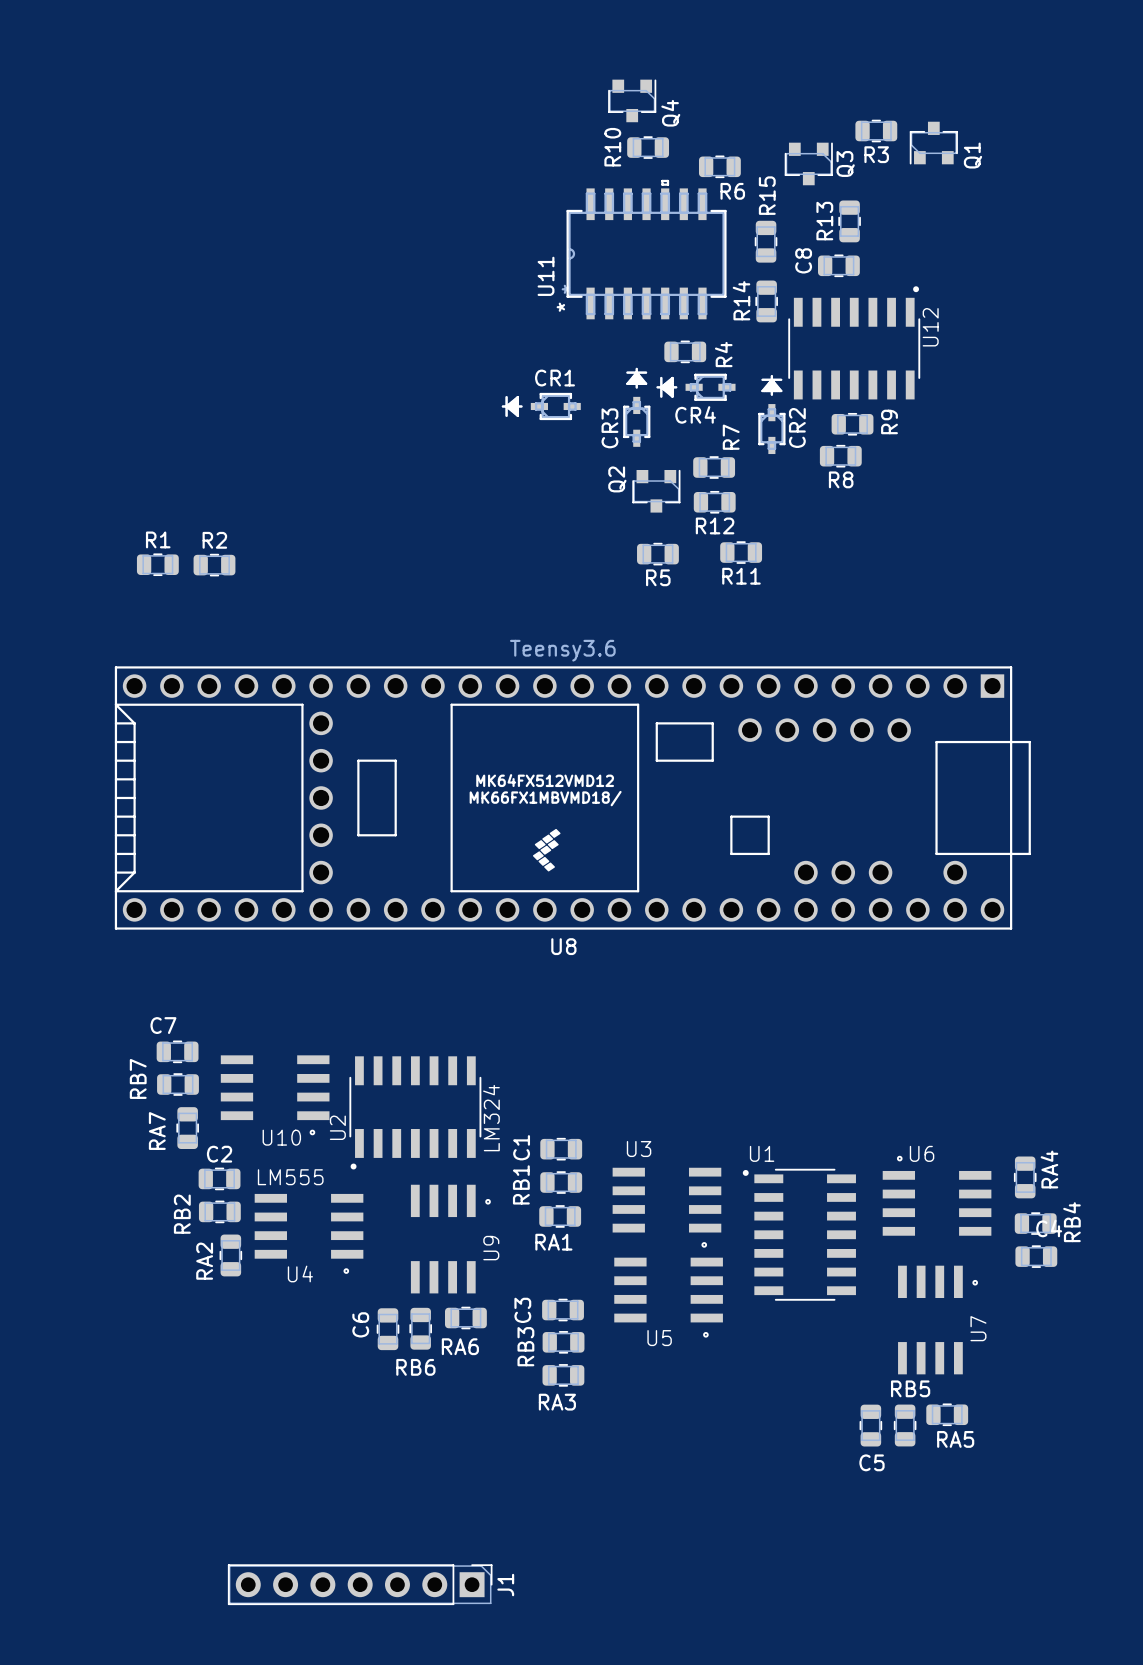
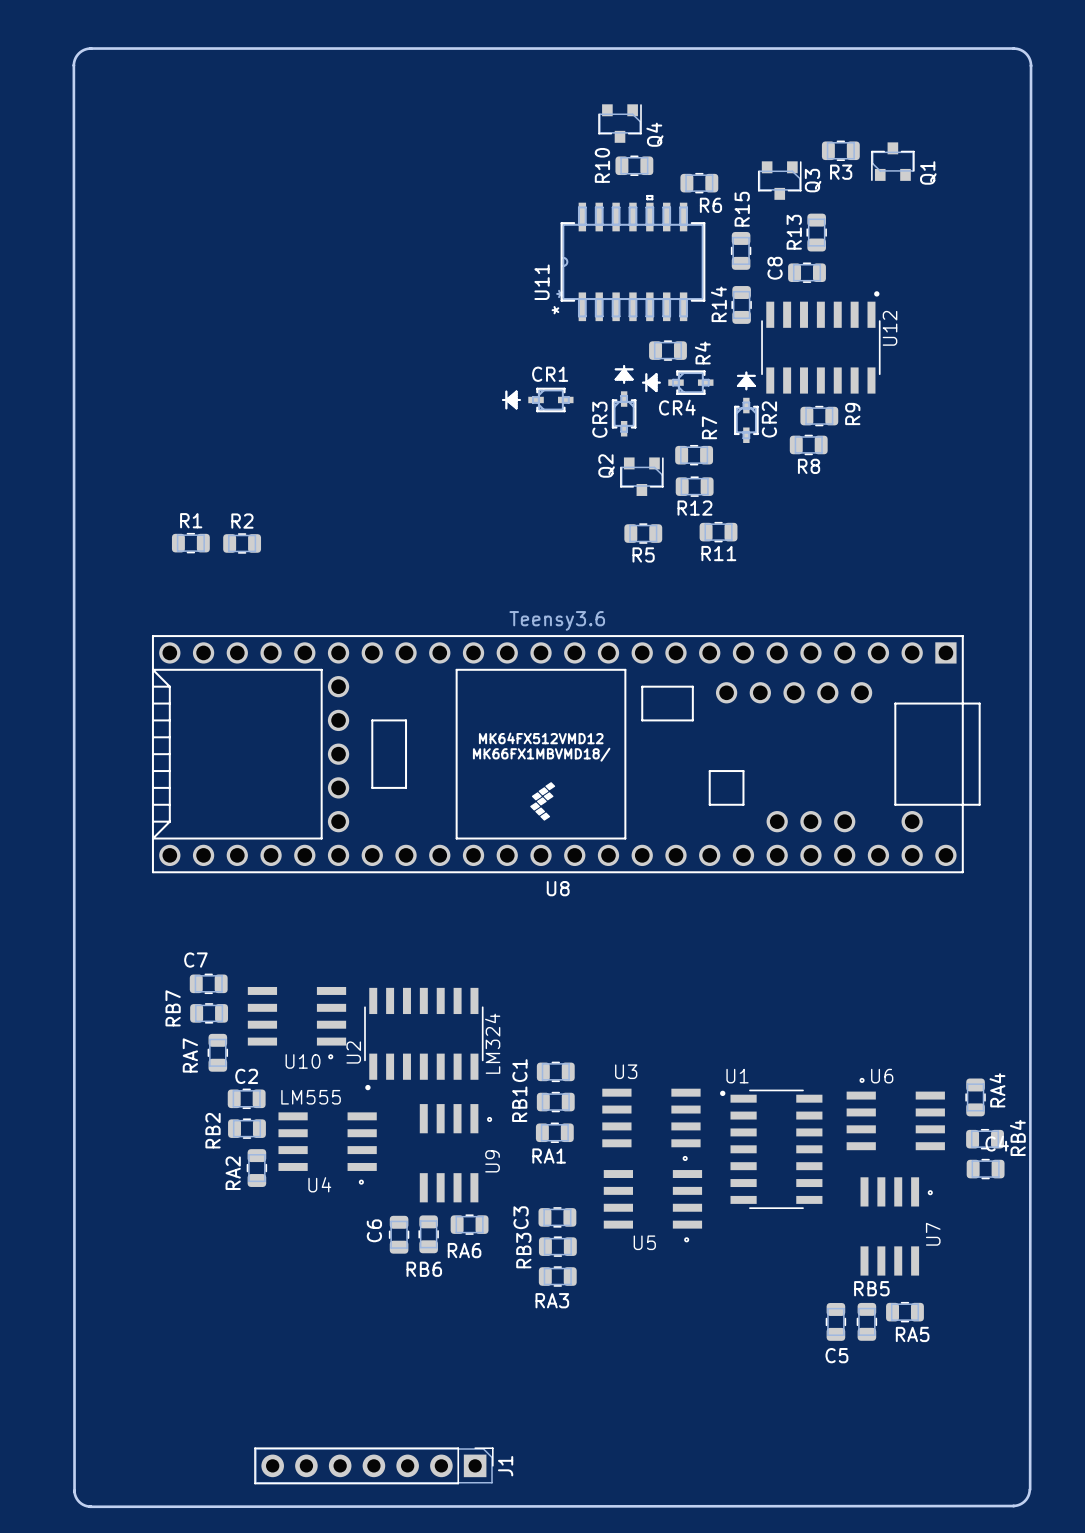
board edge: none -> (90, 48) (1013, 48)
board edge: none -> (91, 48) (78, 53) (73, 65)
board edge: none -> (1013, 48) (1026, 53) (1031, 66)
board edge: none -> (73, 65) (74, 1492)
board edge: none -> (1031, 65) (1030, 1489)
board edge: none -> (1029, 1489) (1024, 1501) (1013, 1505)
board edge: none -> (74, 1490) (79, 1502) (91, 1506)
board edge: none -> (1014, 1506) (89, 1506)

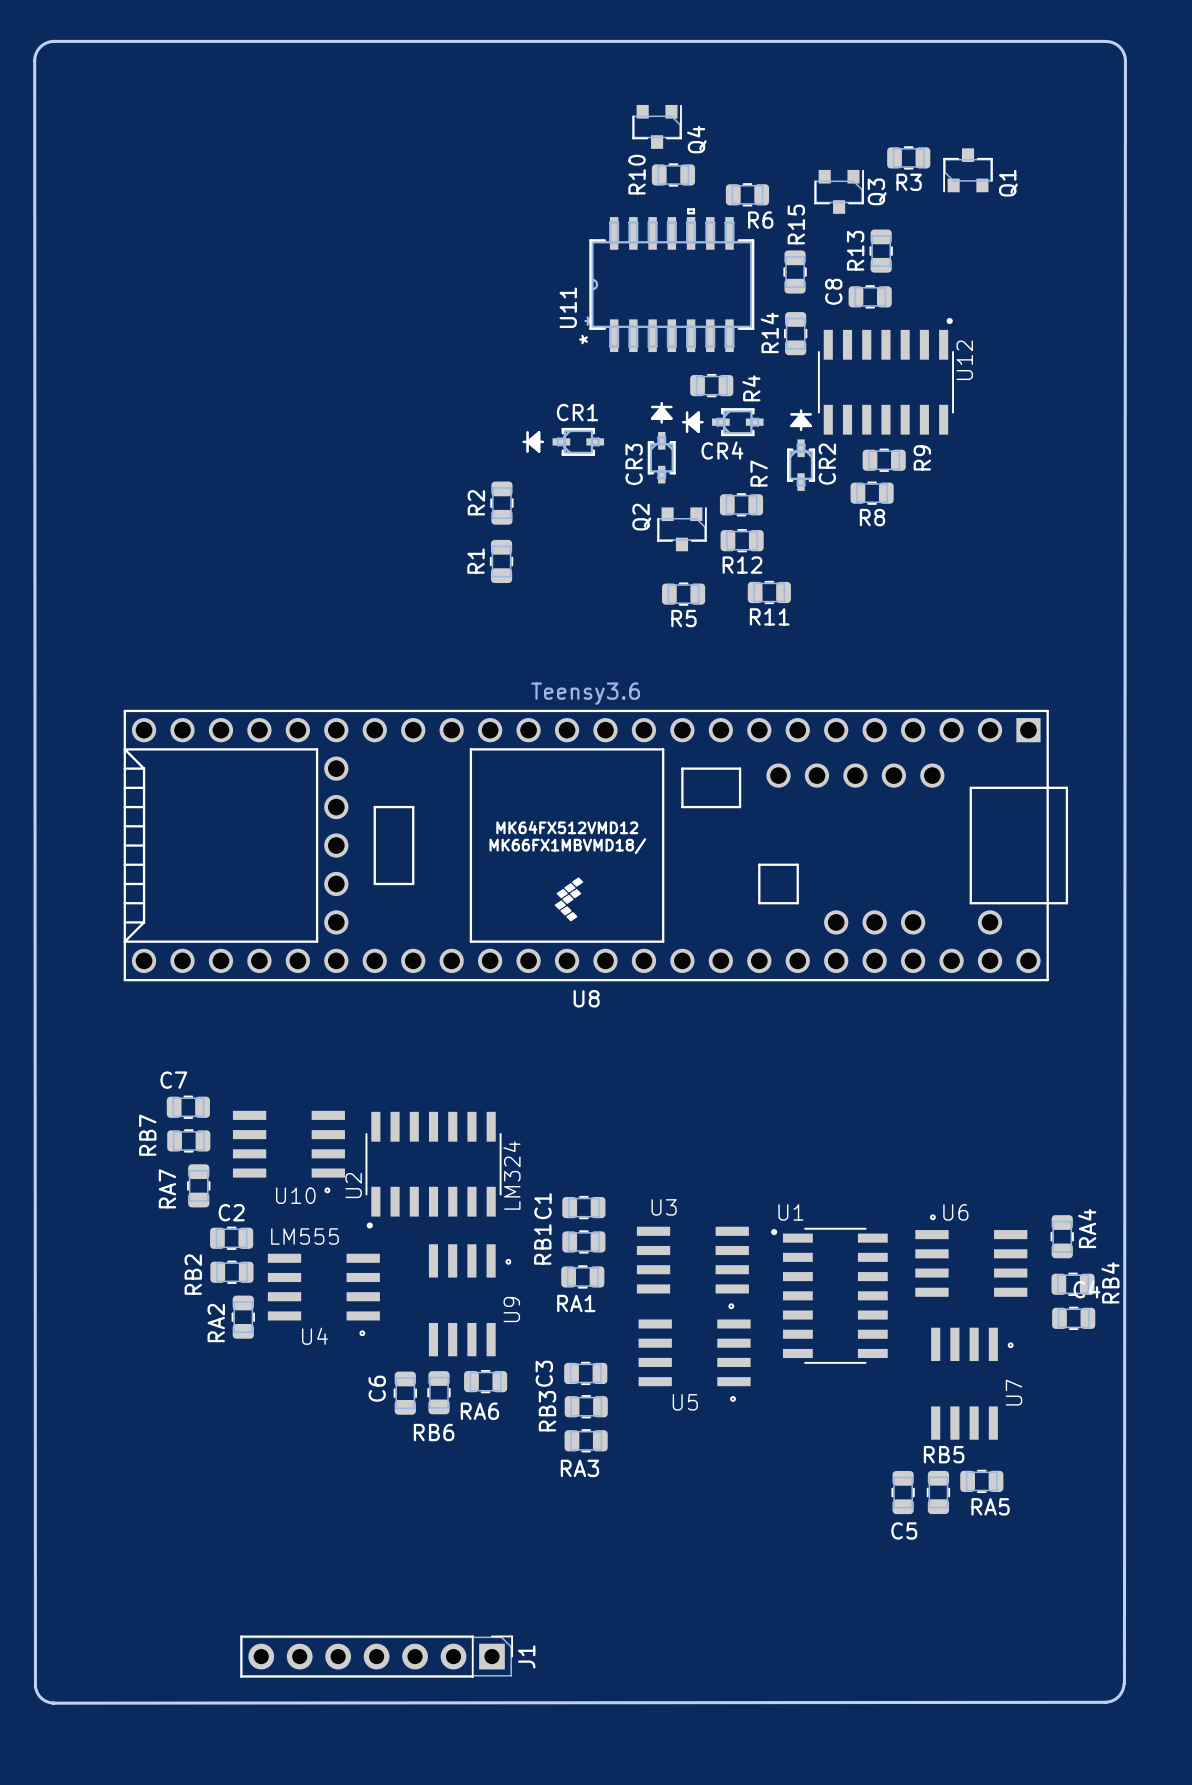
R1 name position: R1 (191, 520) -> R1 (476, 561)
R2 name position: R2 (242, 521) -> R2 (476, 502)
R1 rotation: 0° (190, 543) -> 90° clockwise (501, 561)
R1 position: (190, 543) -> (501, 561)
R2 rotation: 0° (242, 543) -> 90° clockwise (501, 503)
R2 position: (242, 543) -> (501, 503)

